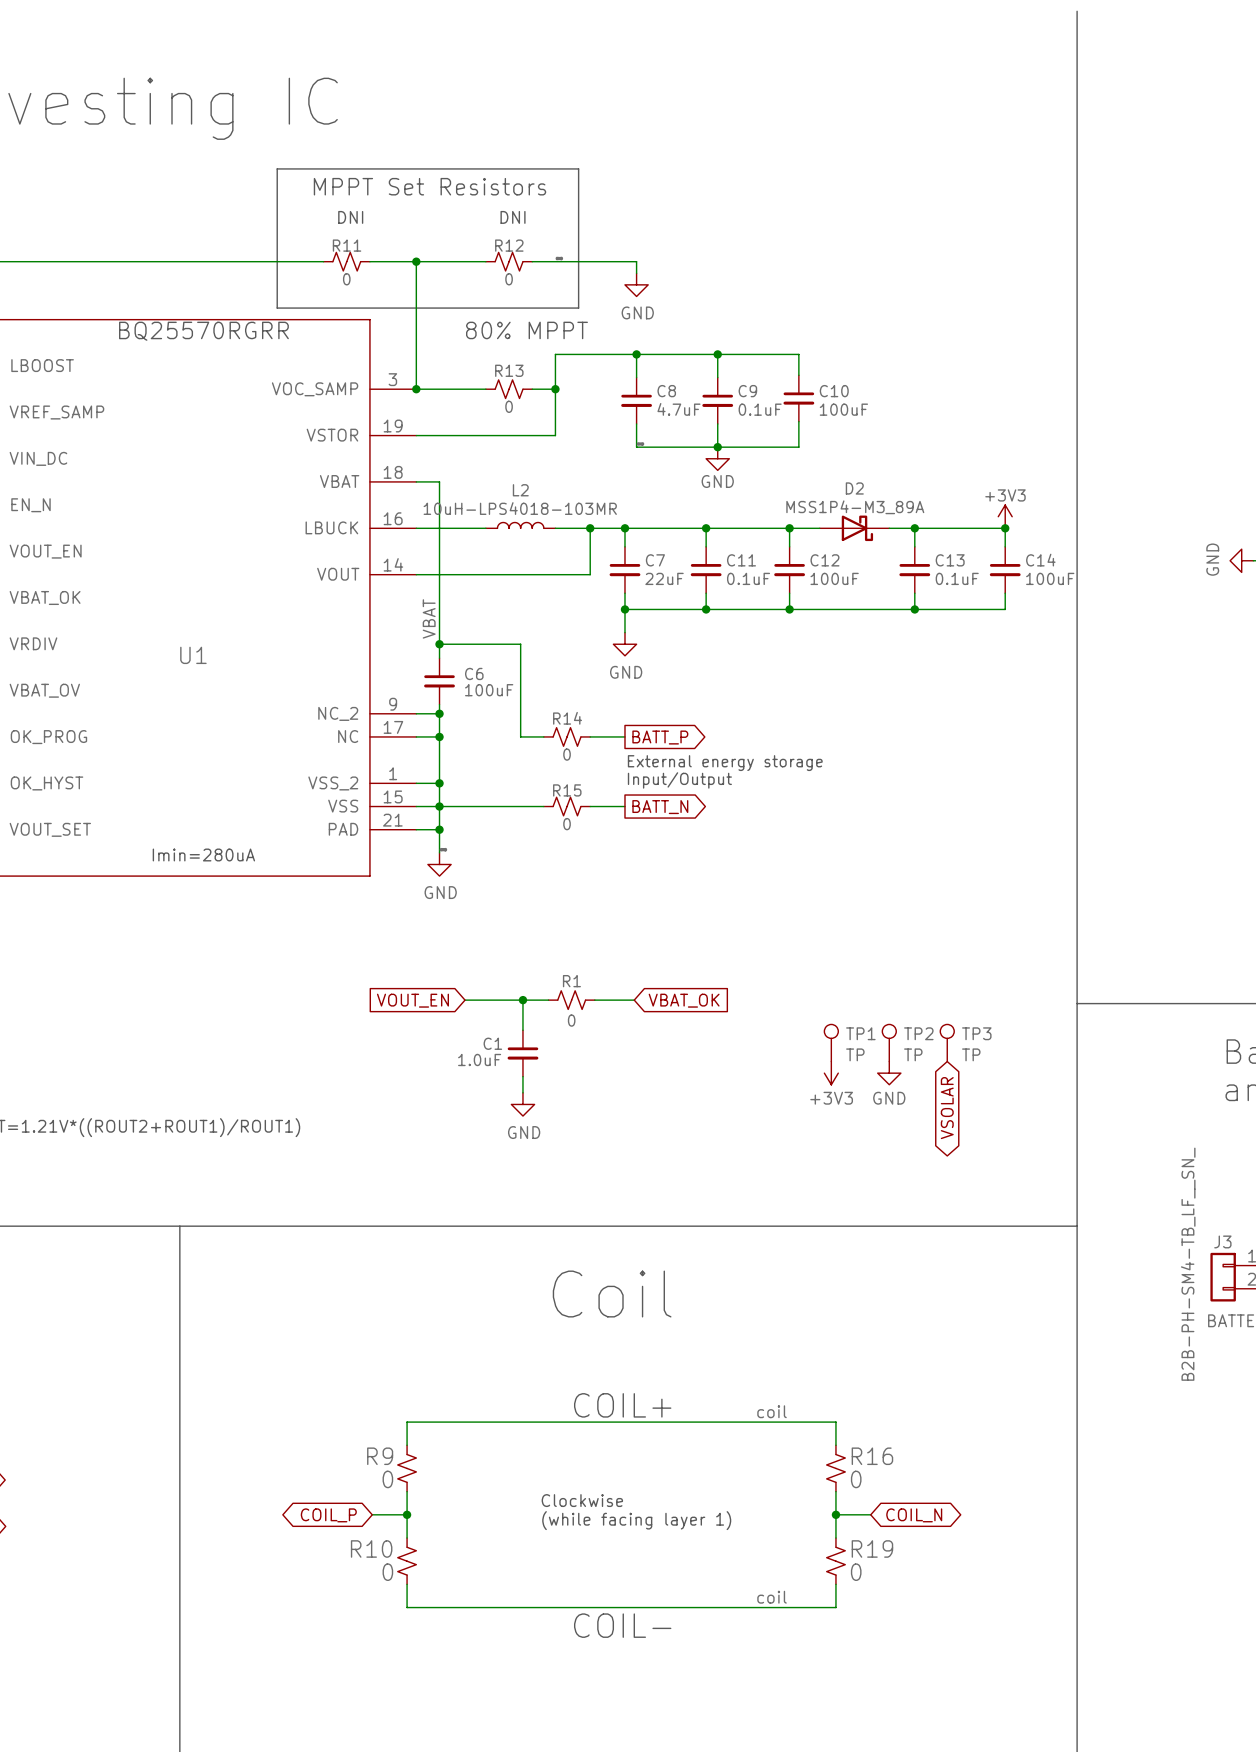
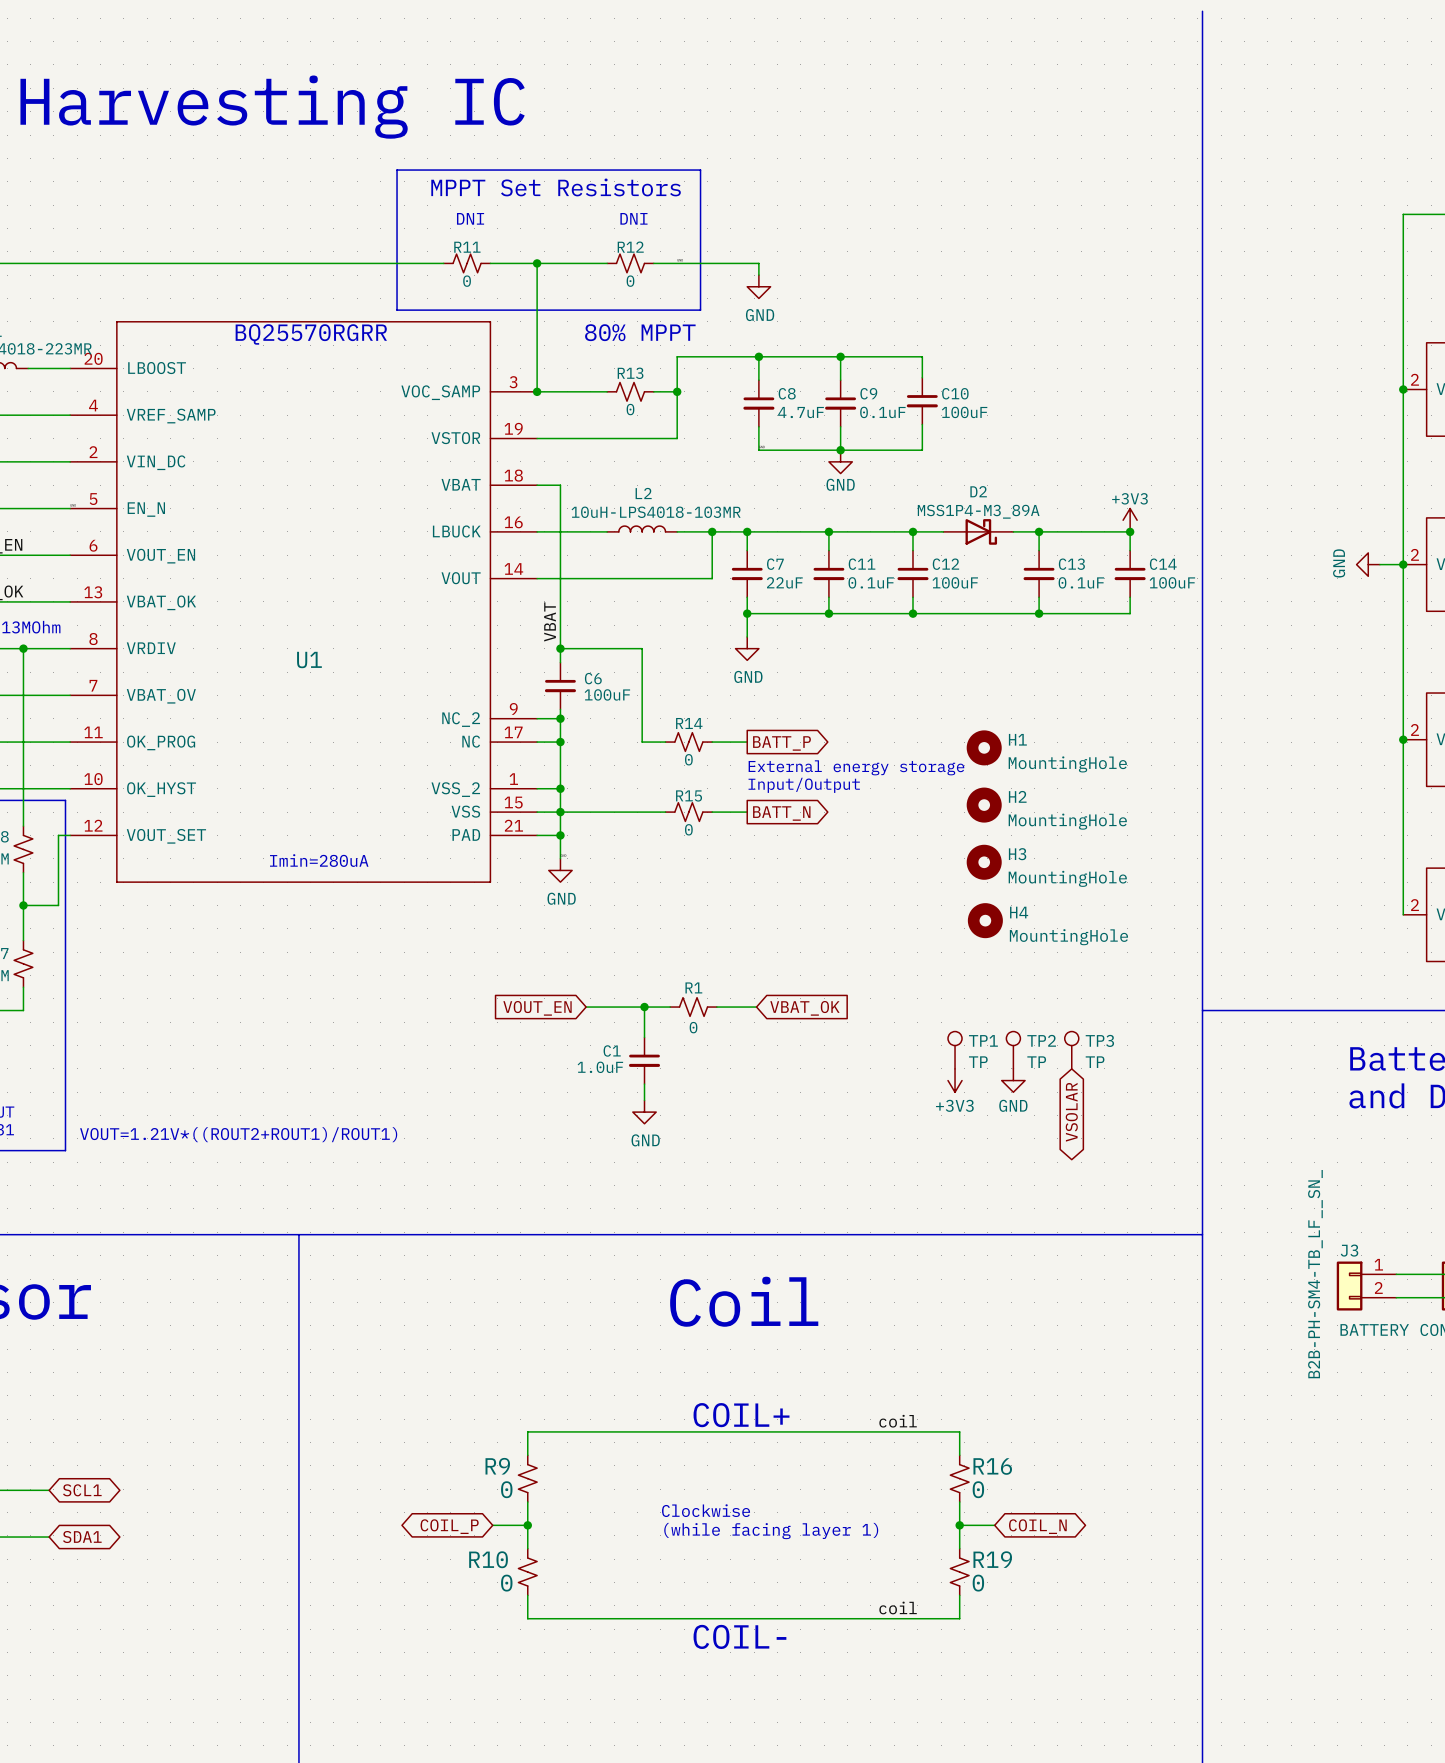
H1: none -> MountingHole (984, 747)
H2: none -> MountingHole (984, 805)
H3: none -> MountingHole (984, 862)
H4: none -> MountingHole (985, 920)

